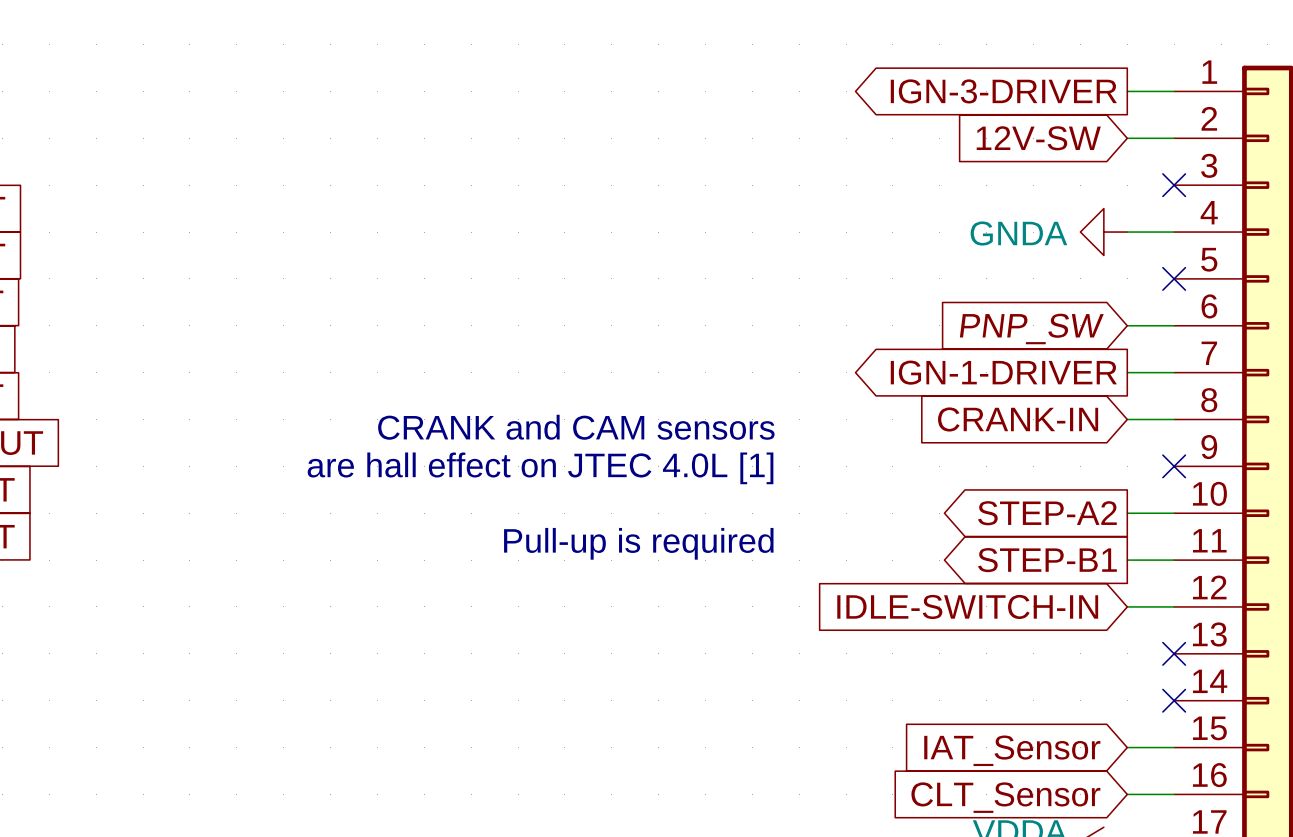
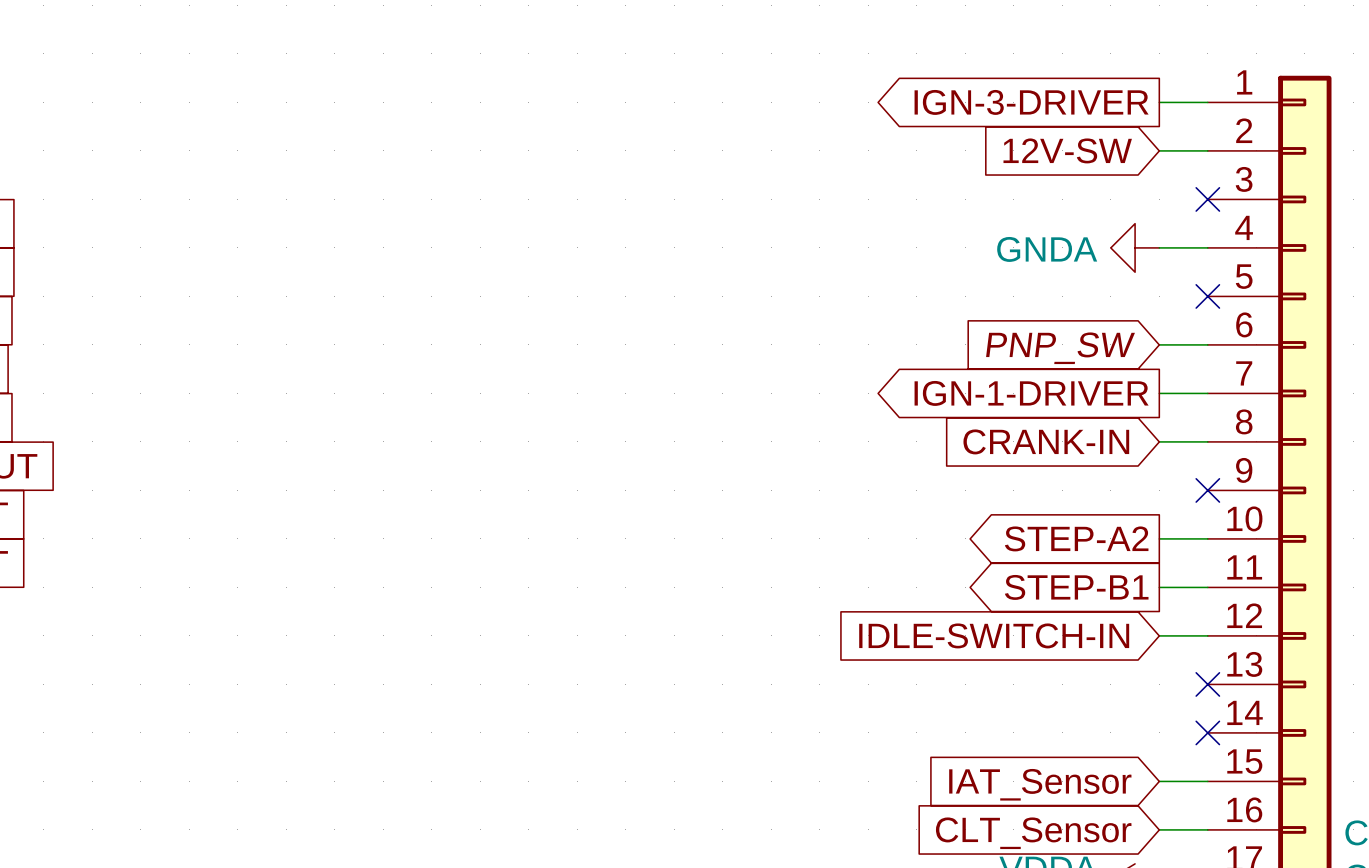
text: CRANK and CAM sensors (576, 427) -> none
text: are hall effect on JTEC 4.0L [1] (540, 468) -> none
text: Pull-up is required (638, 543) -> none

